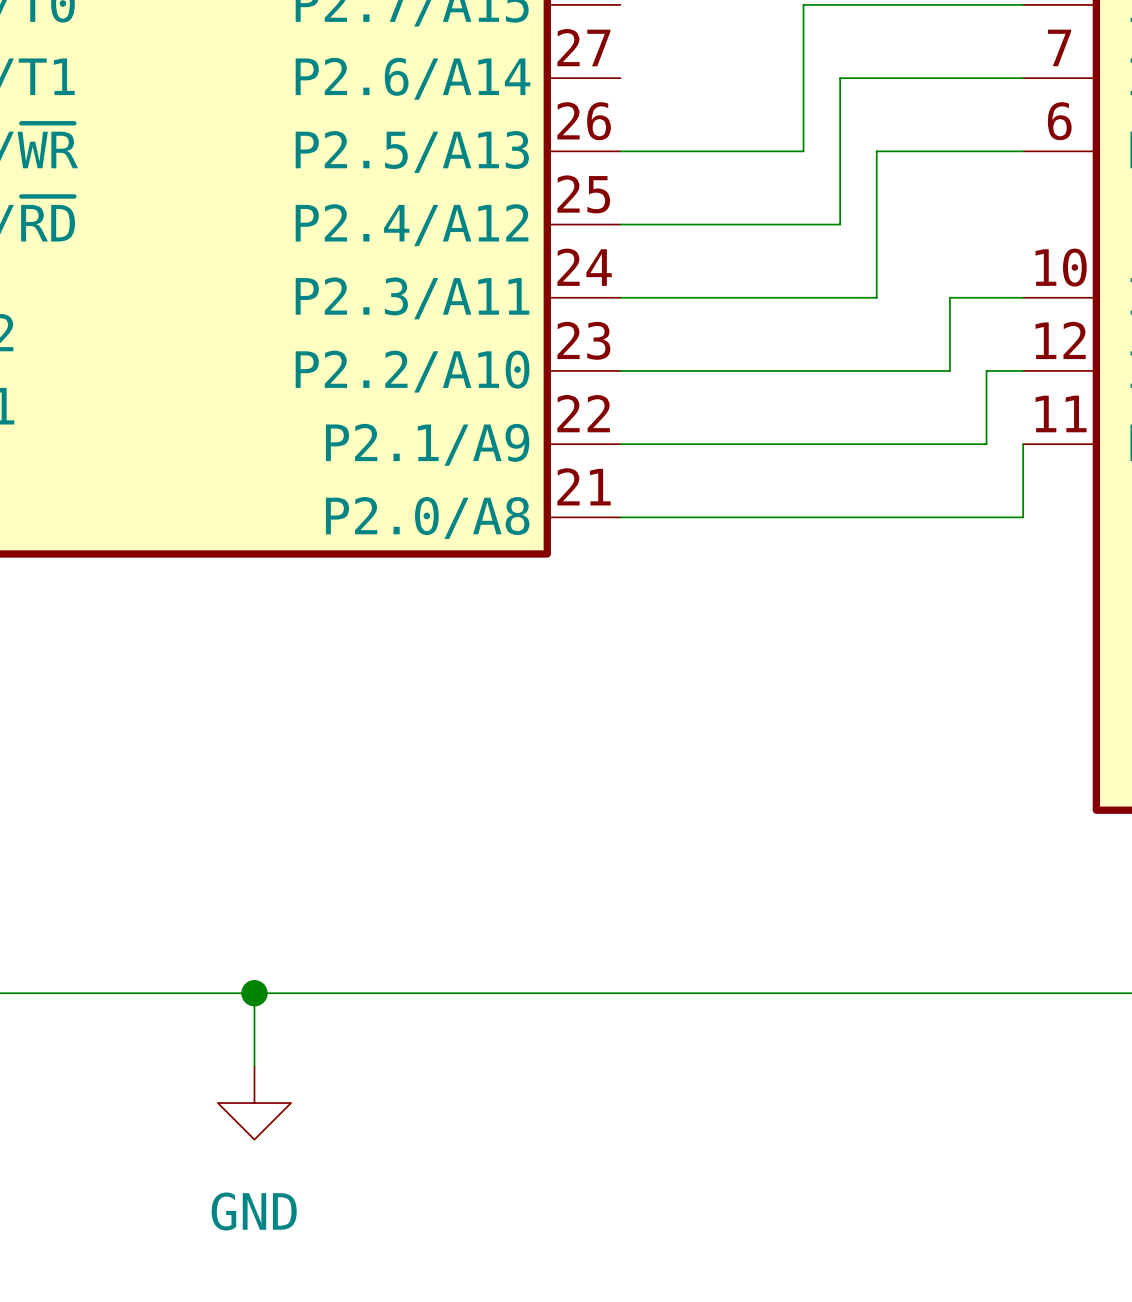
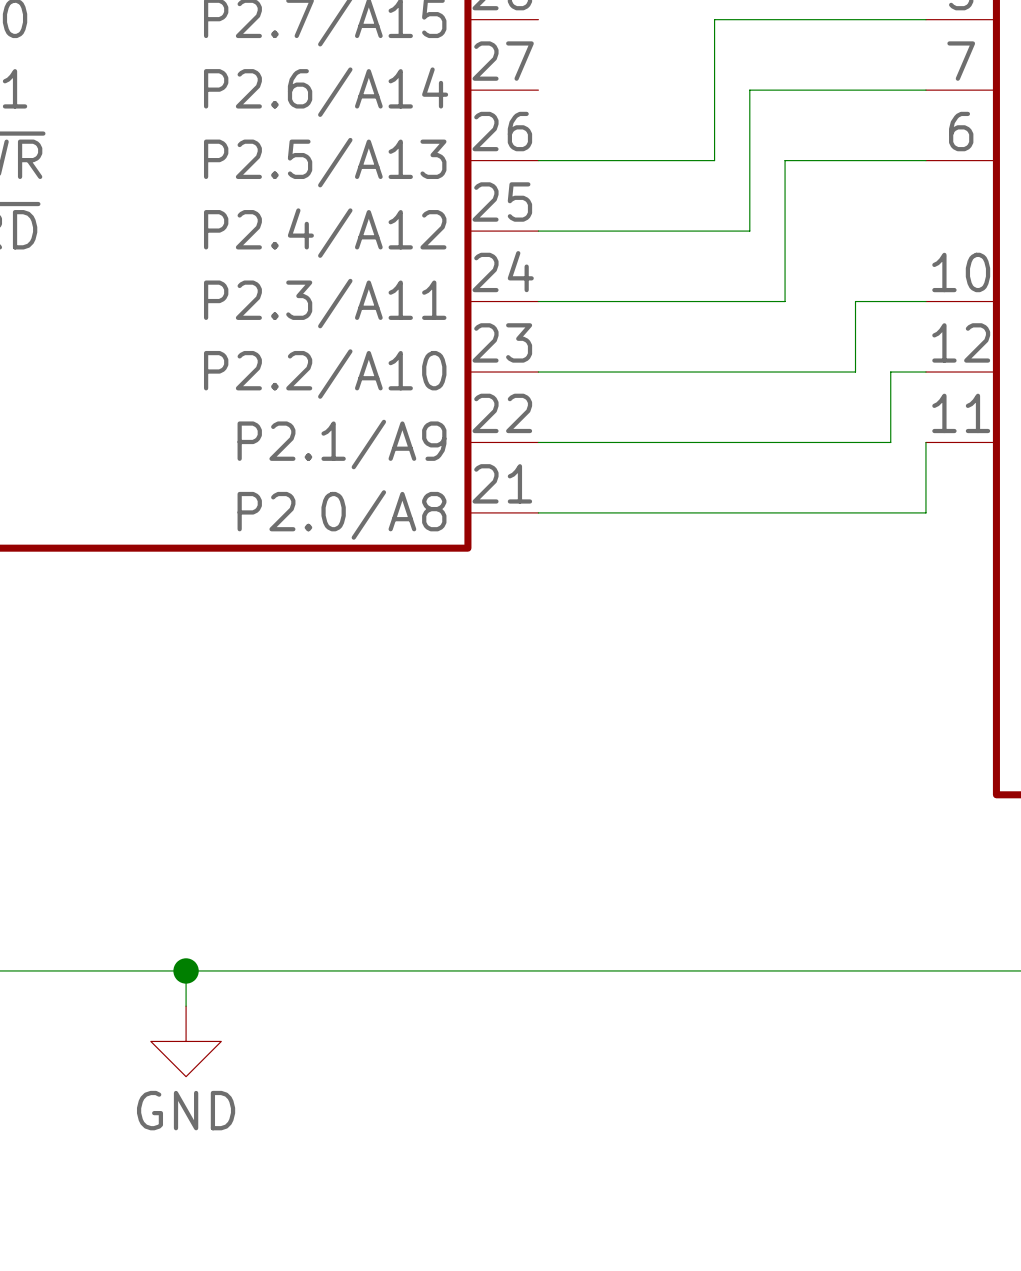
power symbol position: GND (254, 1103) -> GND (186, 1041)
power symbol text position: GND (254, 1211) -> GND (186, 1110)

